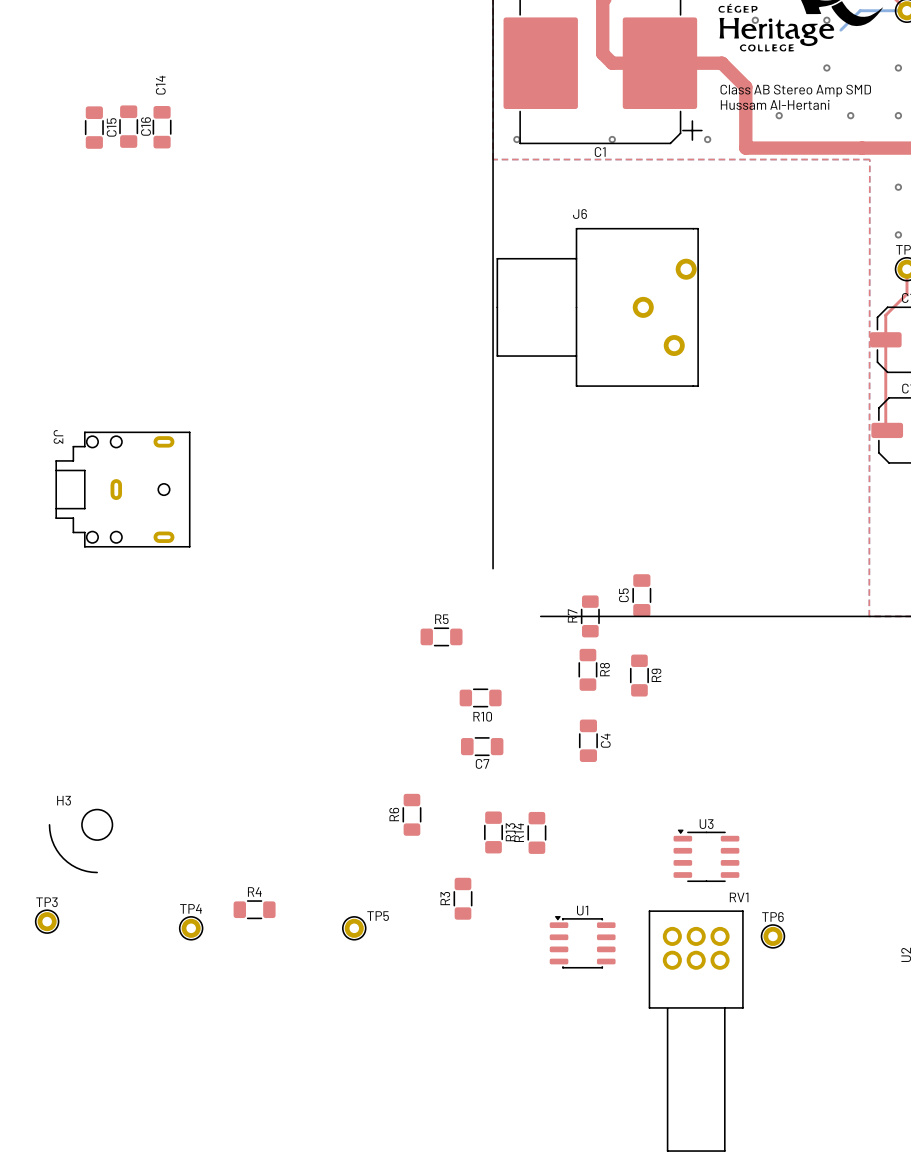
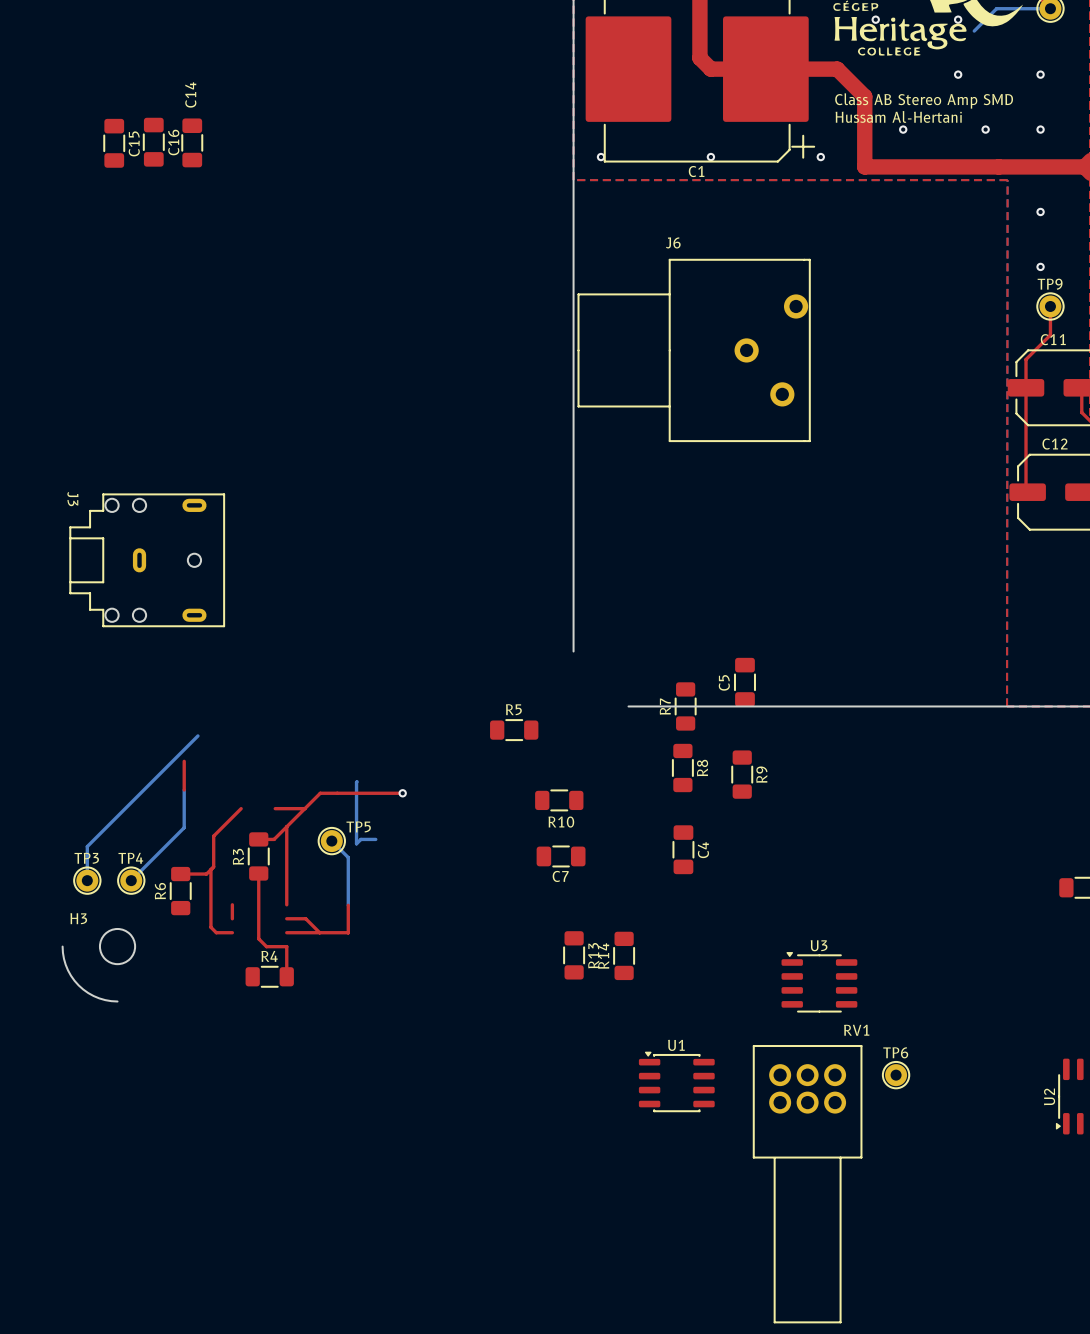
bottom track: none -> (197, 735) (87, 846) (87, 880)
top track: none -> (184, 761) (184, 789)
bottom track: none -> (357, 781) (356, 843) (360, 839) (375, 839)
bottom track: none -> (184, 789) (184, 827) (131, 880)
top track: none -> (402, 793) (320, 793) (274, 839) (258, 839)
via: none -> (402, 793)
top track: none -> (241, 808) (213, 836) (213, 866) (206, 874) (180, 874)
top track: none -> (275, 808) (304, 808)
top track: none -> (286, 826) (286, 904)
bottom track: none -> (332, 842) (348, 857) (348, 905)
top track: none -> (210, 869) (210, 927) (216, 932) (232, 932)
top track: none -> (258, 873) (258, 938) (266, 946) (286, 946) (286, 976)
top track: none -> (232, 904) (232, 918)
top track: none -> (348, 905) (348, 932)
top track: none -> (286, 918) (305, 918) (319, 932)
top track: none -> (286, 932) (348, 932)
R6 position: (411, 814) -> (180, 891)
R3 position: (462, 898) -> (258, 856)
R4 position: (254, 909) -> (269, 976)
TP3 position: (47, 921) -> (87, 880)
TP4 position: (191, 928) -> (131, 880)
TP5 position: (354, 928) -> (331, 841)

